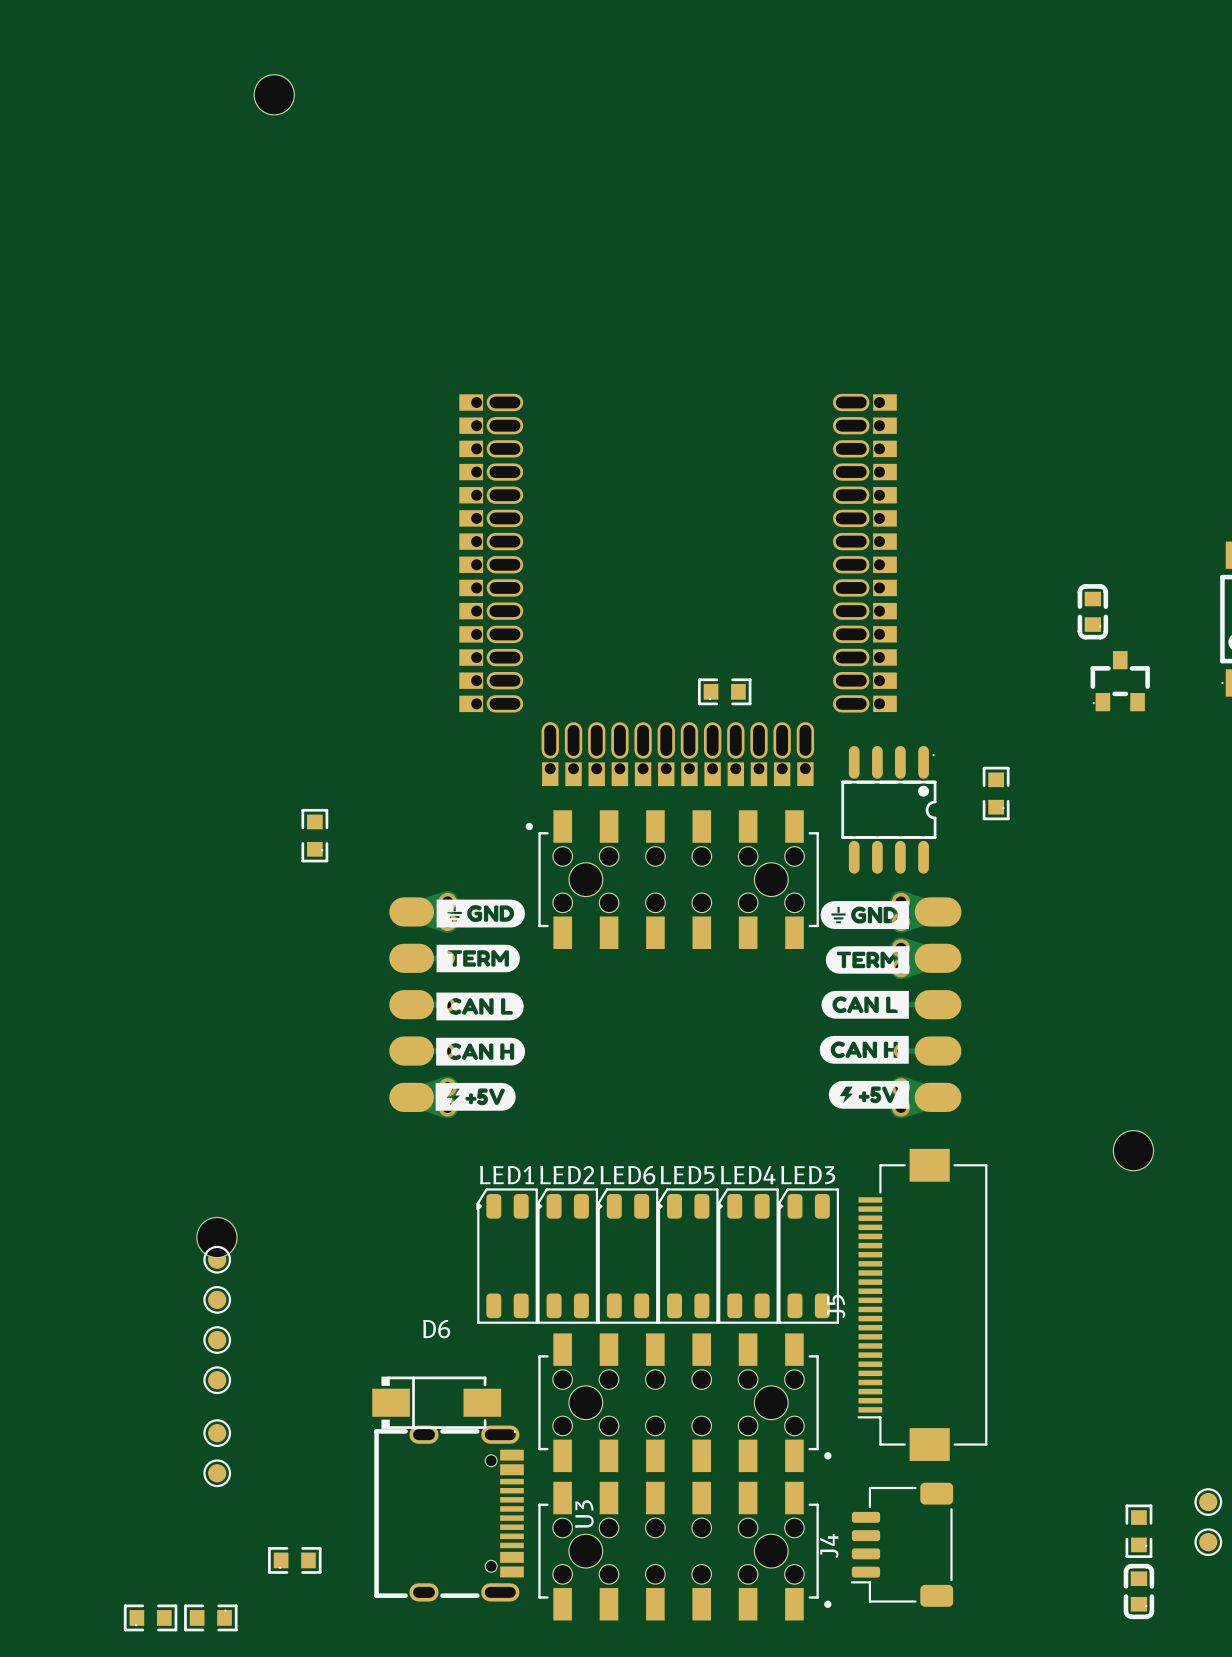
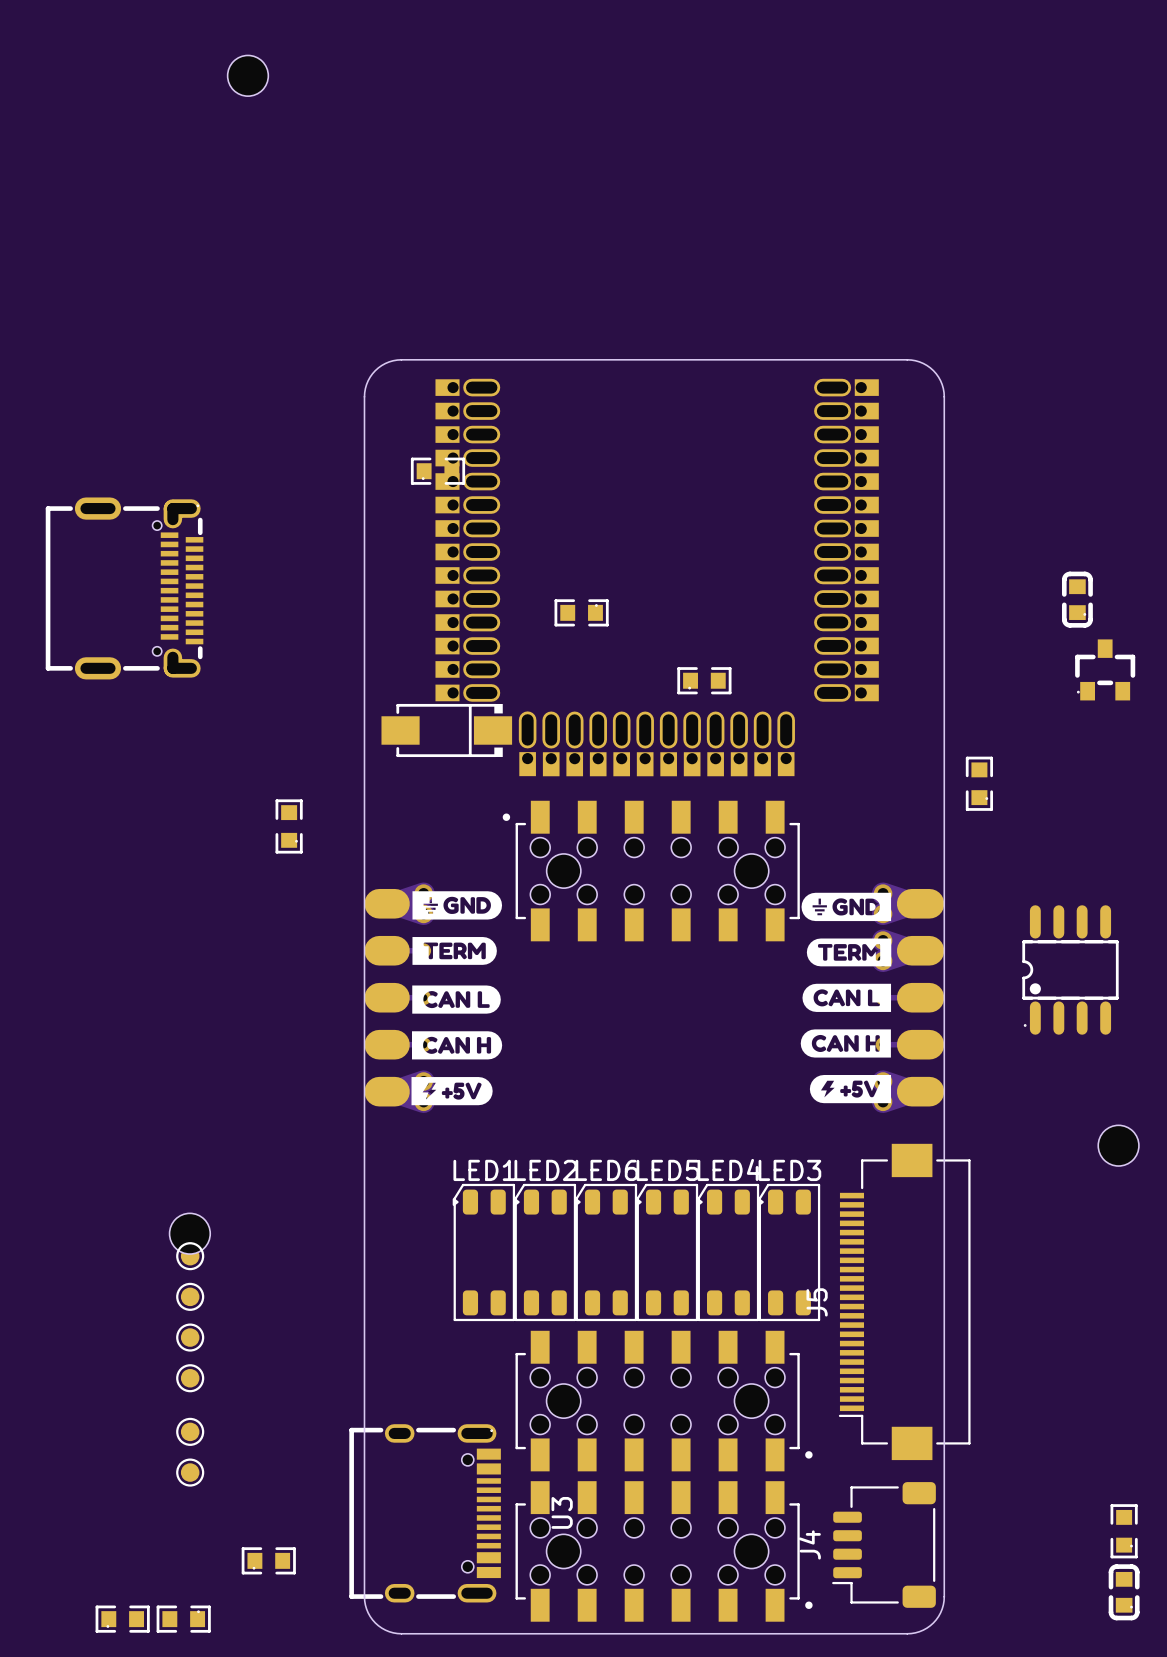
board edge: none -> (401, 359) (907, 359) (919, 361) (930, 367) (942, 384) (944, 396) (944, 1596) (938, 1616) (930, 1625) (919, 1631) (907, 1633) (401, 1633) (389, 1631) (378, 1625) (366, 1609) (364, 1596) (364, 396) (366, 384) (375, 370) (385, 363) (401, 359)
part: none -> (438, 471)
part: none -> (124, 588)
part: none -> (581, 612)
part: none -> (446, 730)
part rotation: 0° (888, 809) -> 180° (1070, 969)
part position: (888, 809) -> (1070, 969)
D6: (436, 1402) -> none

